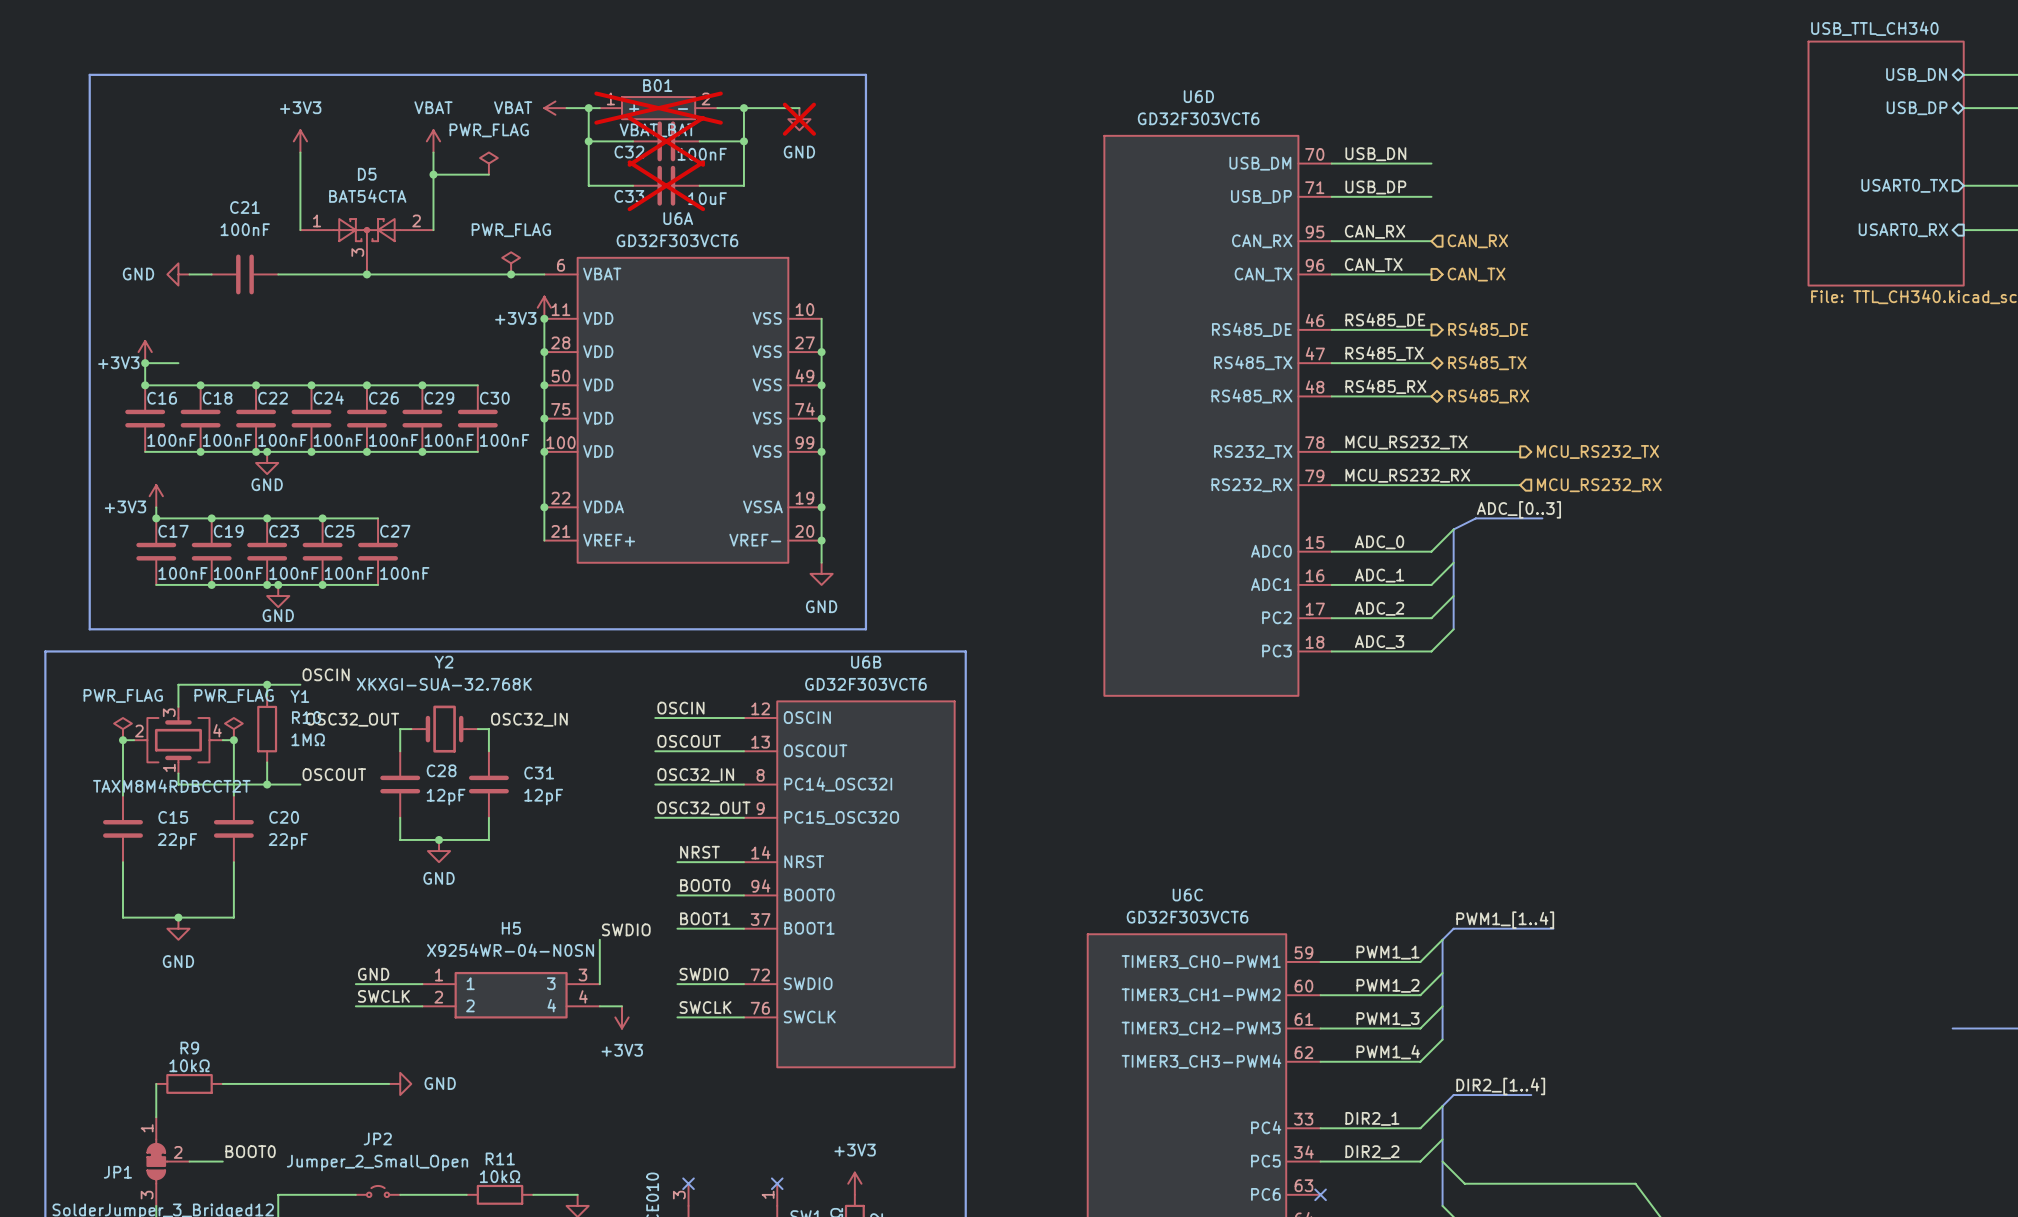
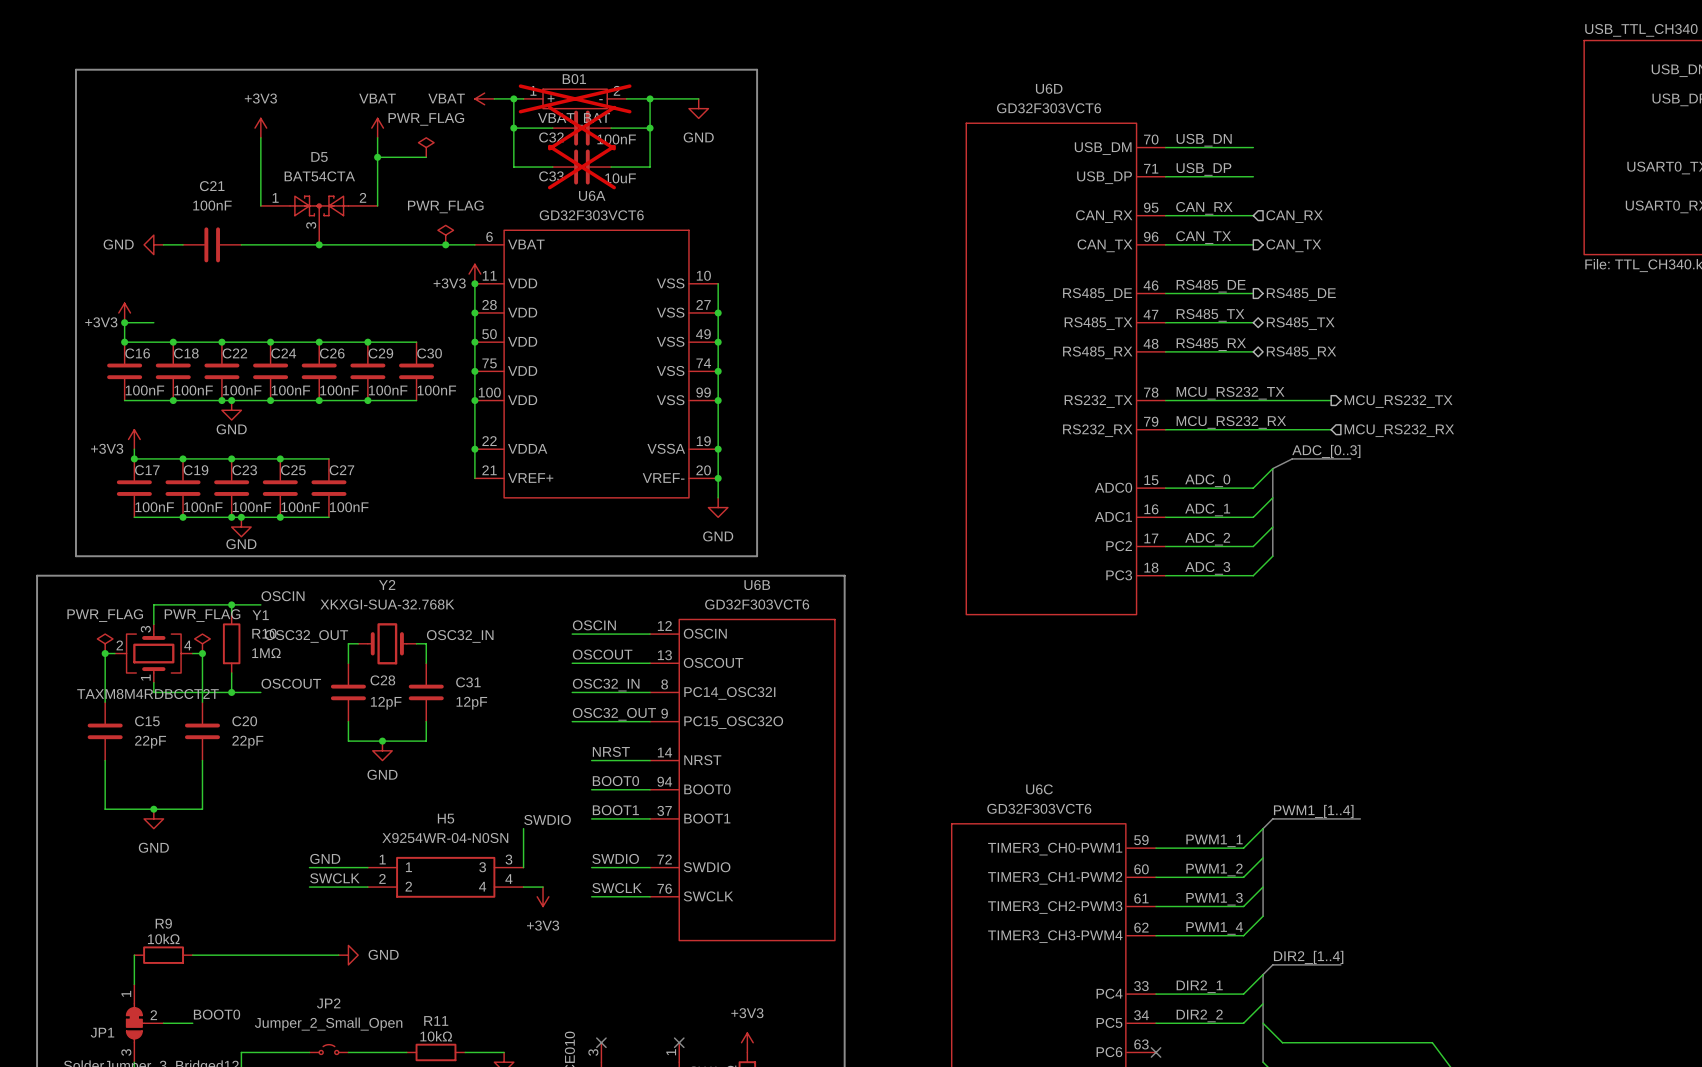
power symbol do-not-place cross: (799, 119) -> none

